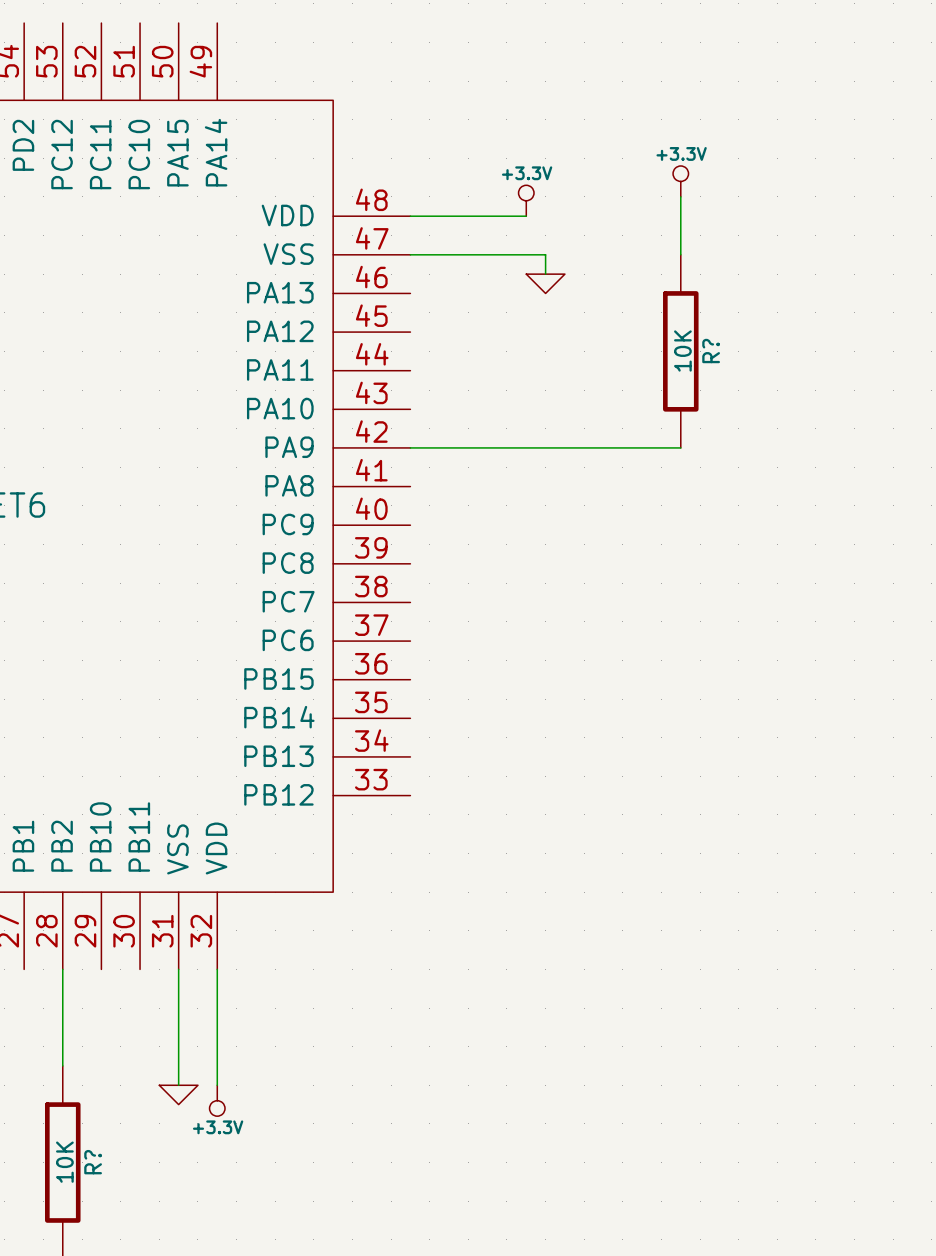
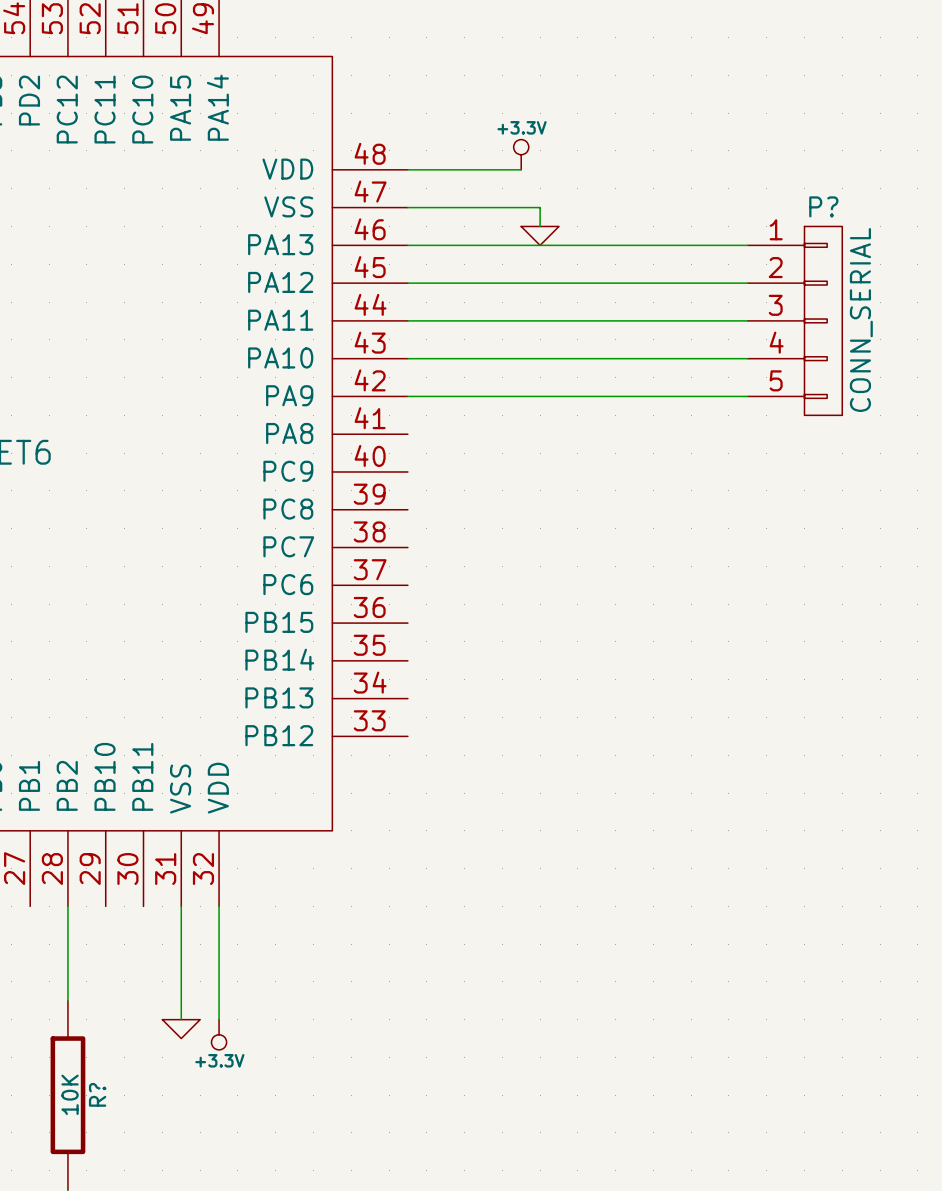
power symbol: +3.3V (680, 181) -> none
wire: (680, 196) (680, 254) -> none
wire: none -> (407, 245) (747, 245)
wire: none -> (407, 283) (747, 283)
R?: 10K (680, 351) -> none
wire: none -> (407, 320) (747, 320)
P?: none -> CONN_SERIAL (795, 320)
wire: none -> (407, 358) (747, 358)
wire: none -> (672, 396) (747, 396)

